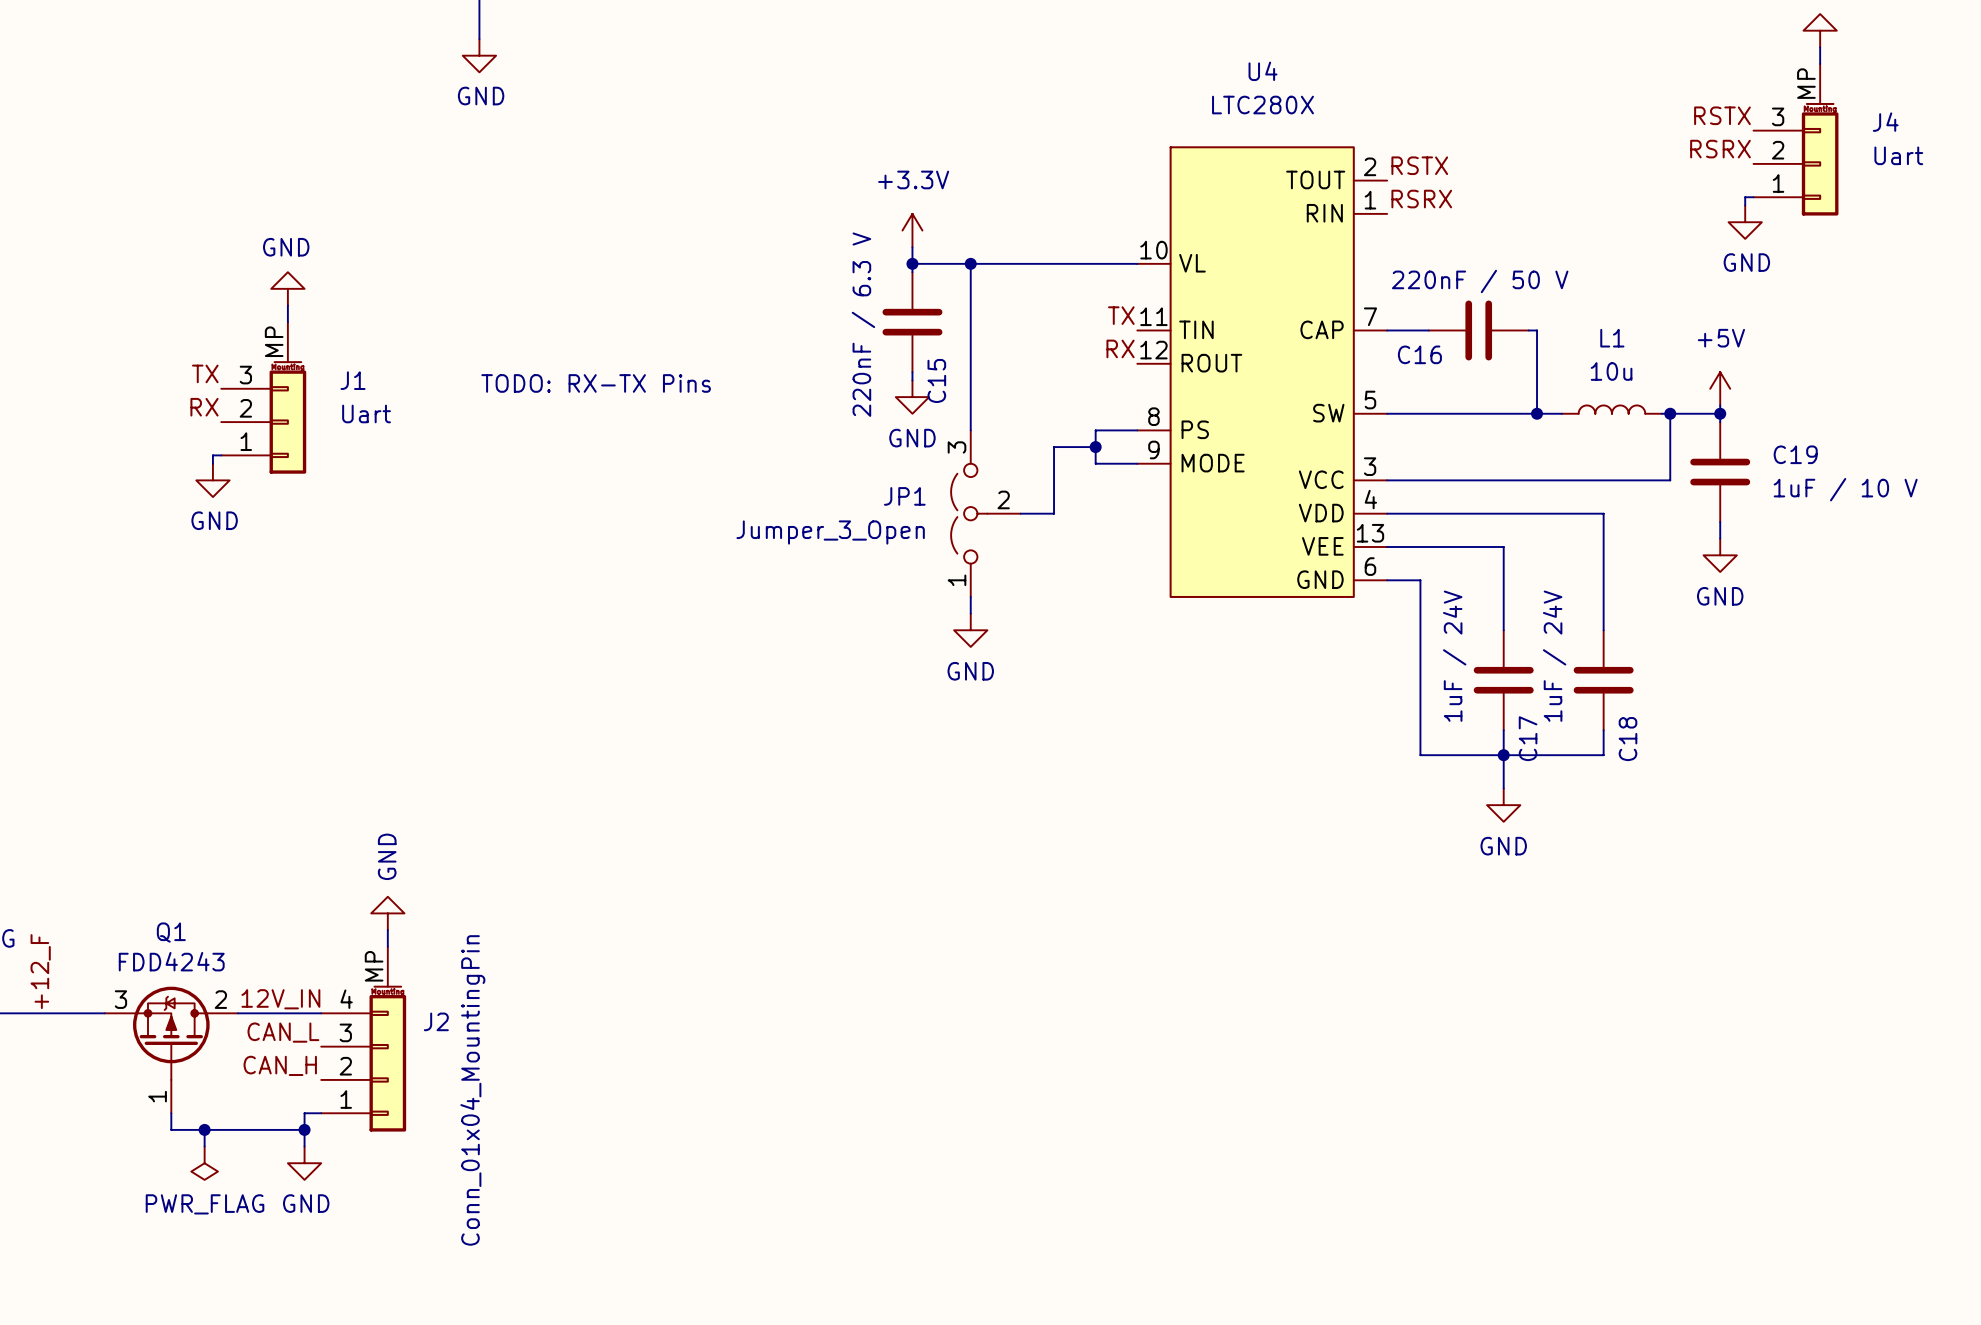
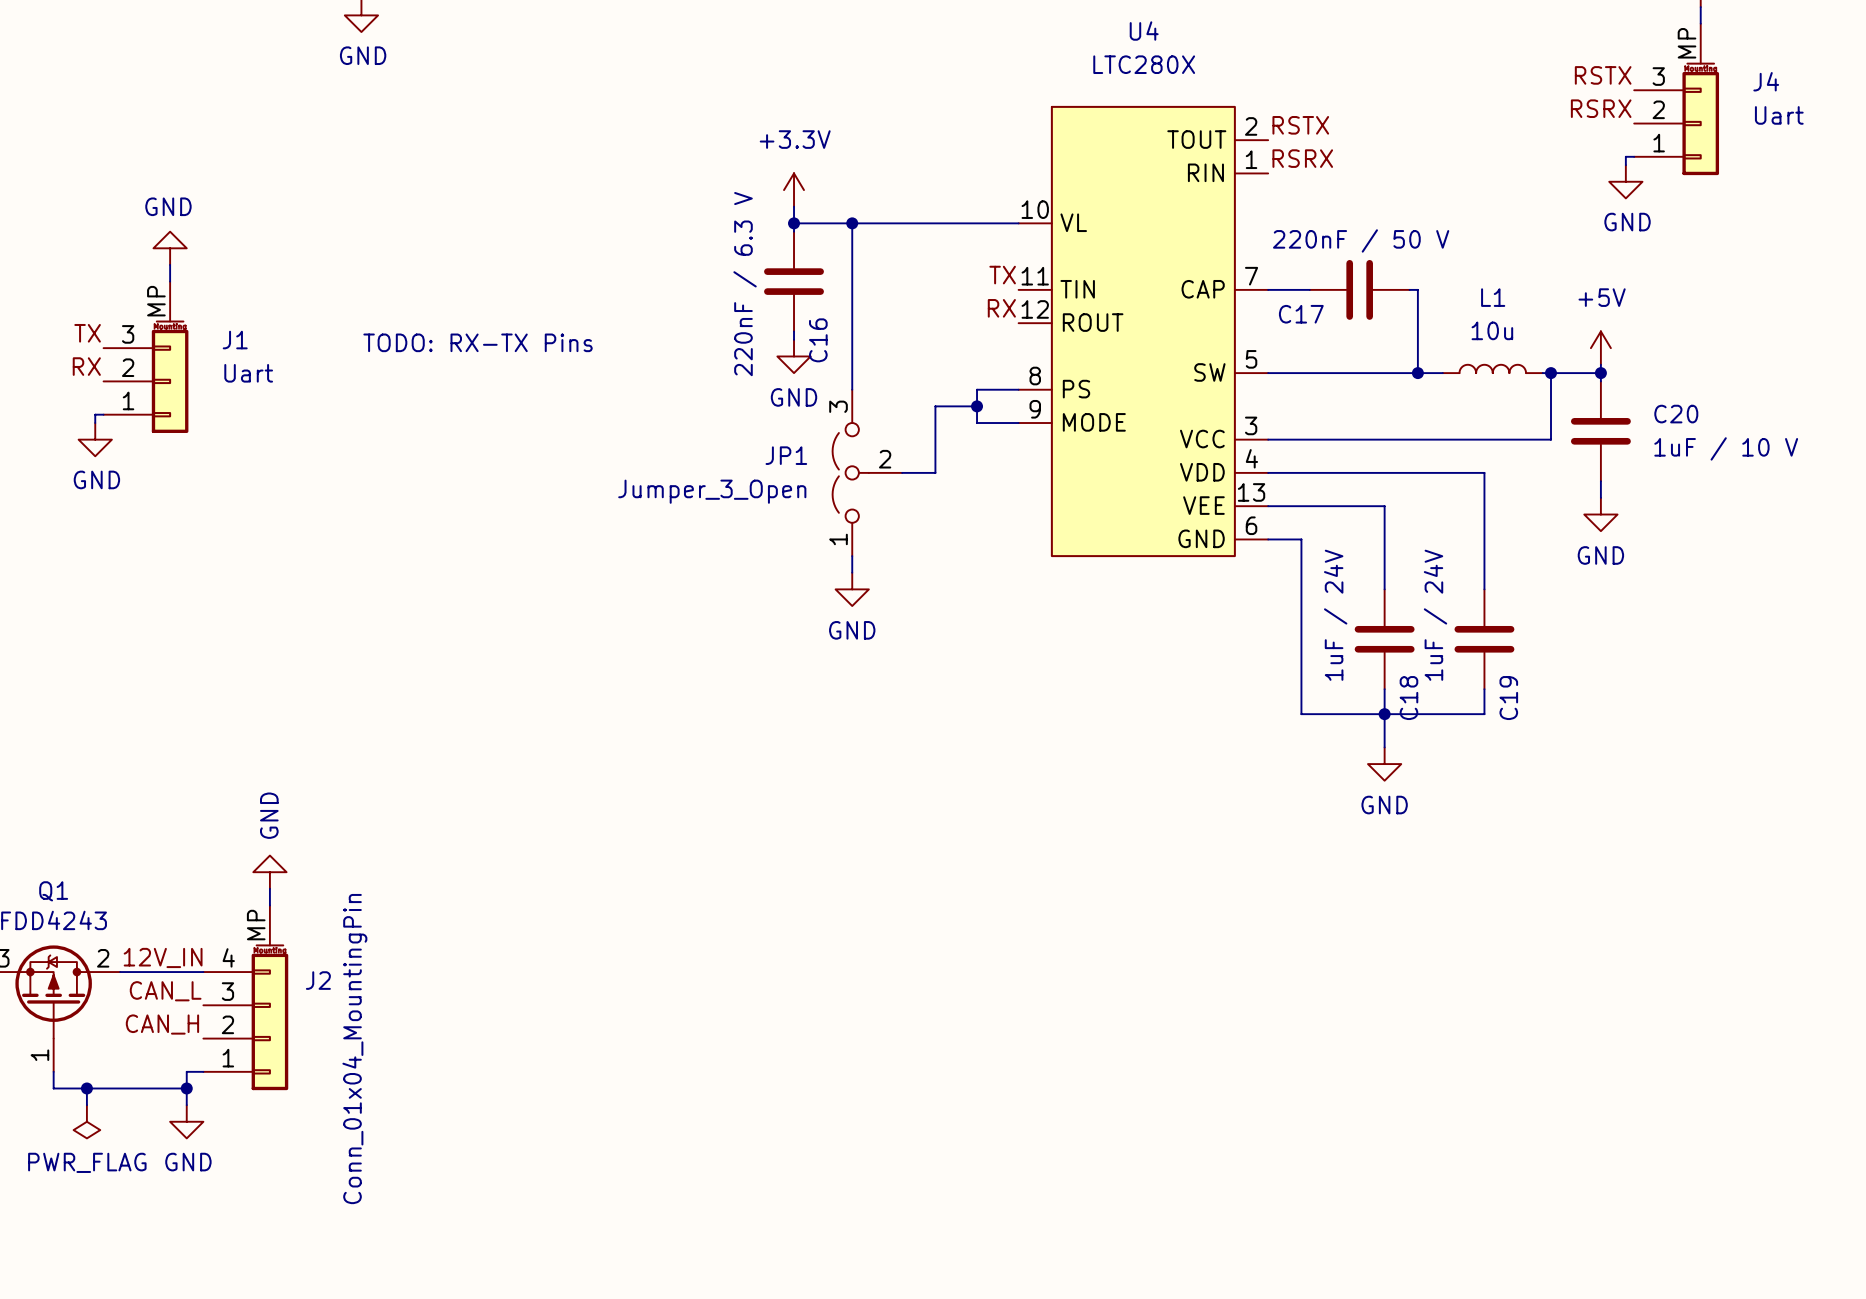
C16 name: C16 (1419, 354) -> C17 (1301, 314)
C15 name: C15 (936, 380) -> C16 (818, 340)
C19 name: C19 (1795, 454) -> C20 (1676, 414)
C17 name: C17 (1528, 738) -> C18 (1408, 698)
C18 name: C18 (1628, 739) -> C19 (1508, 698)

